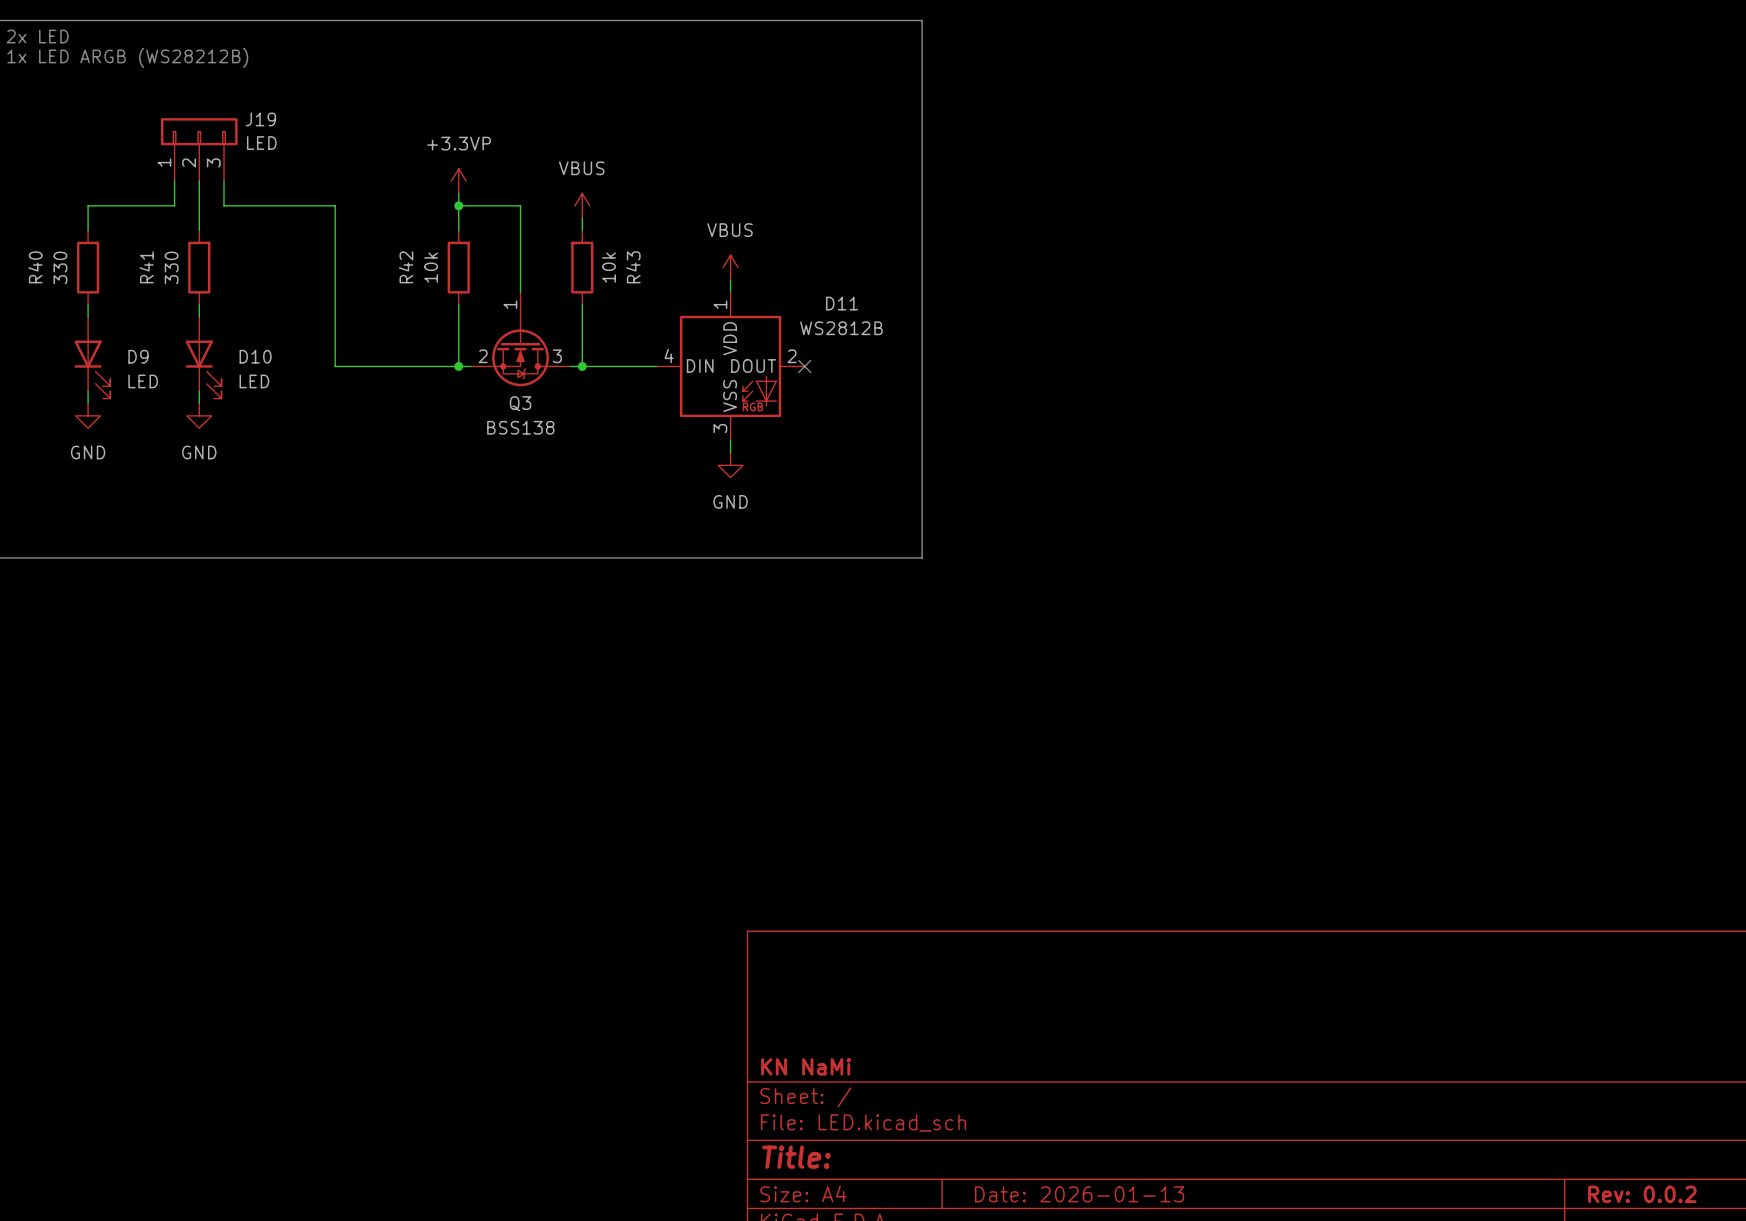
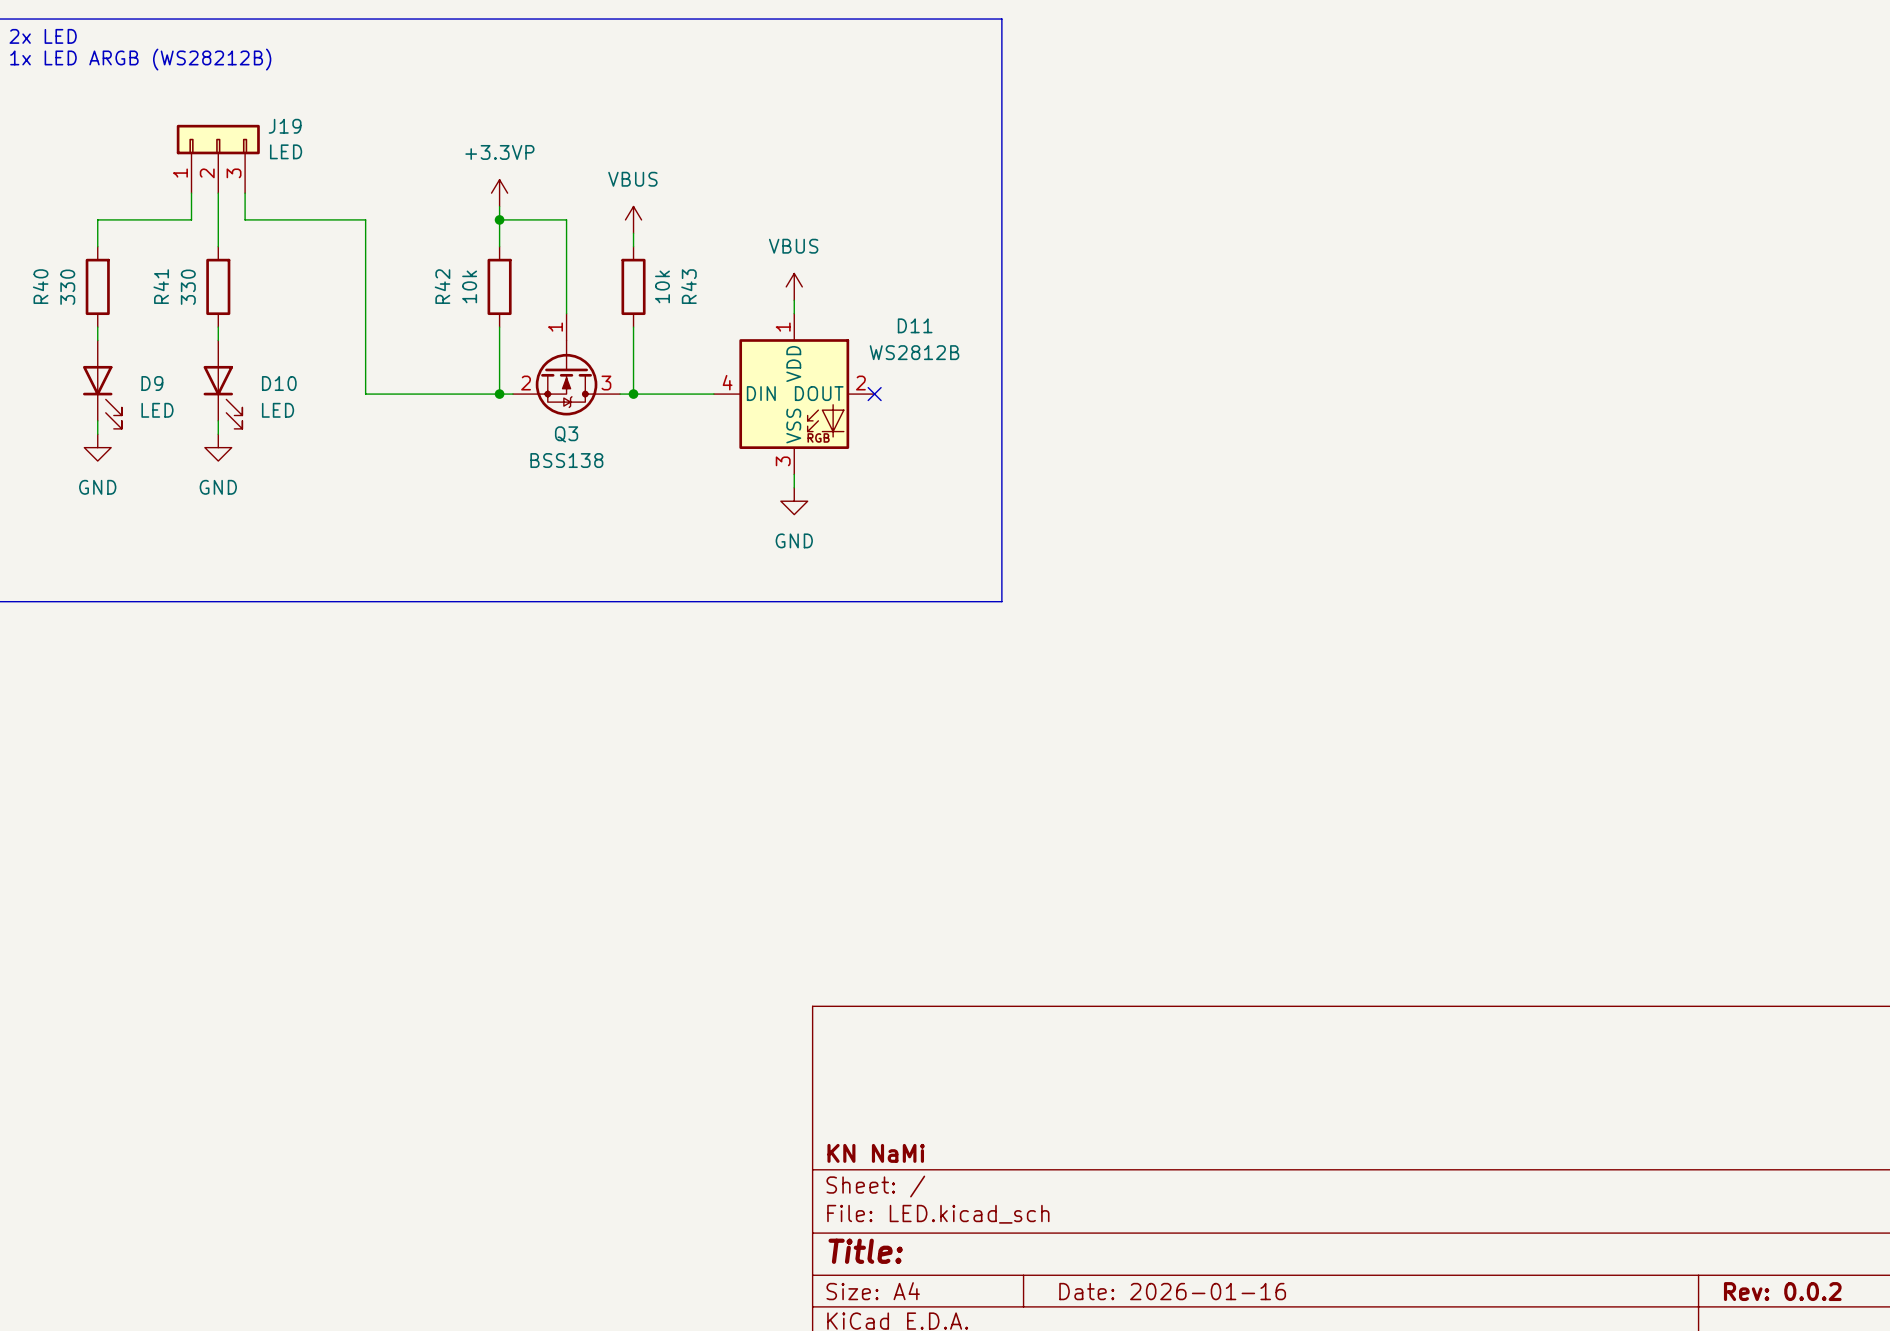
title block: Date: 2026-01-13 (1079, 1194) -> Date: 2026-01-16 (1172, 1291)

